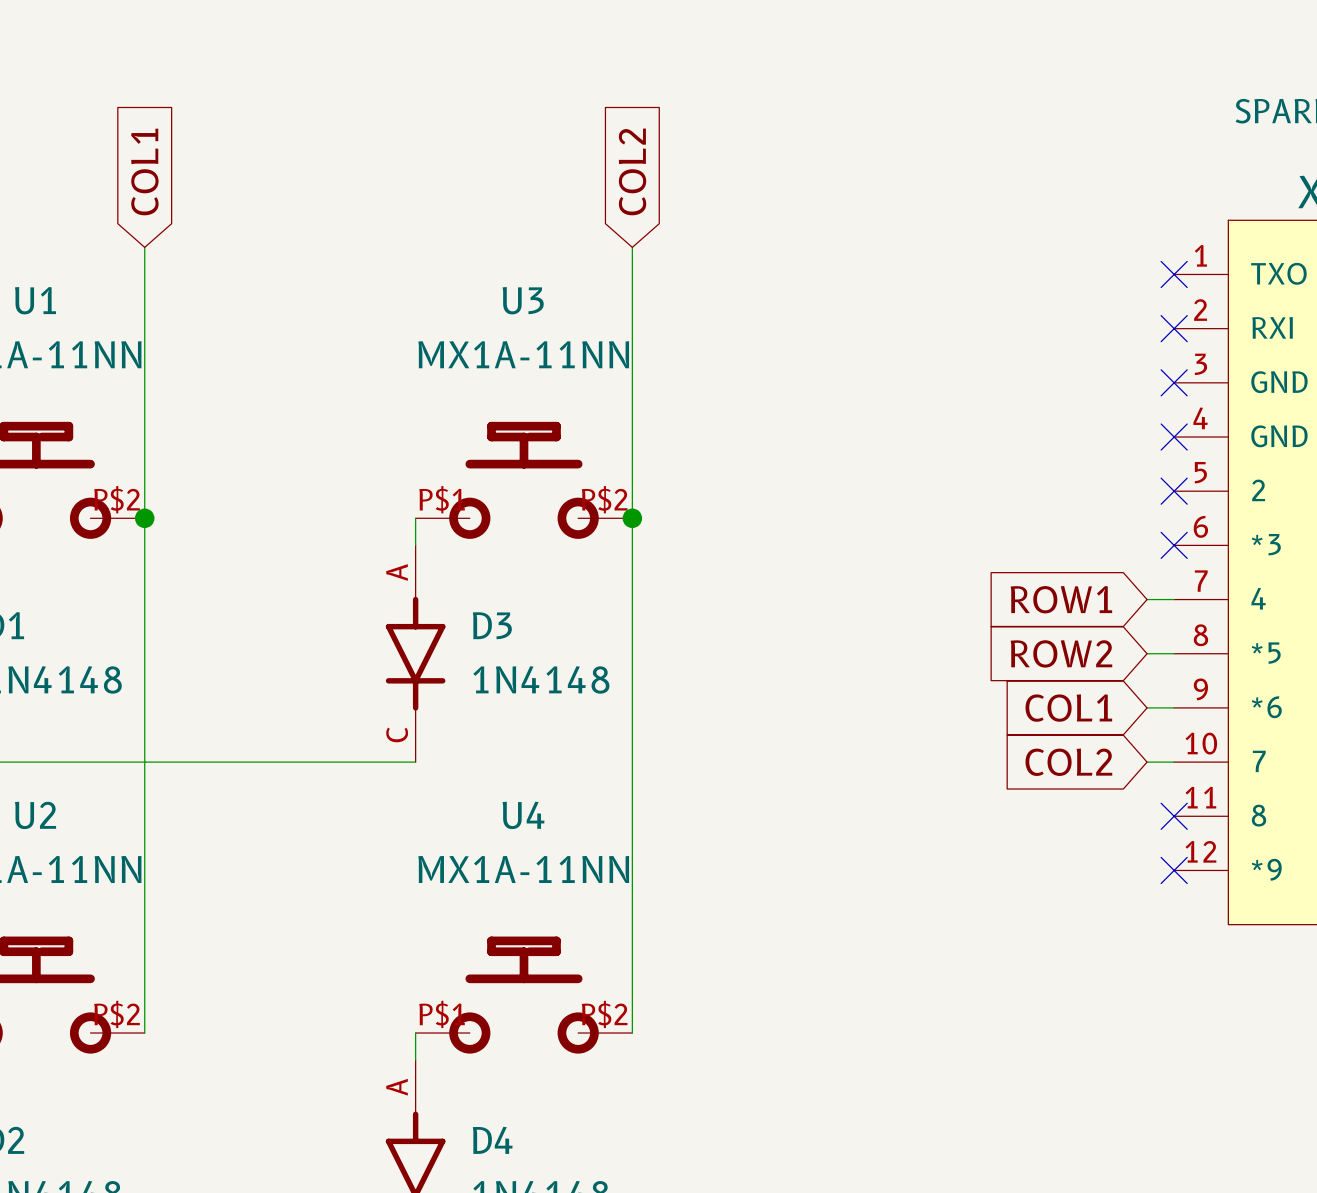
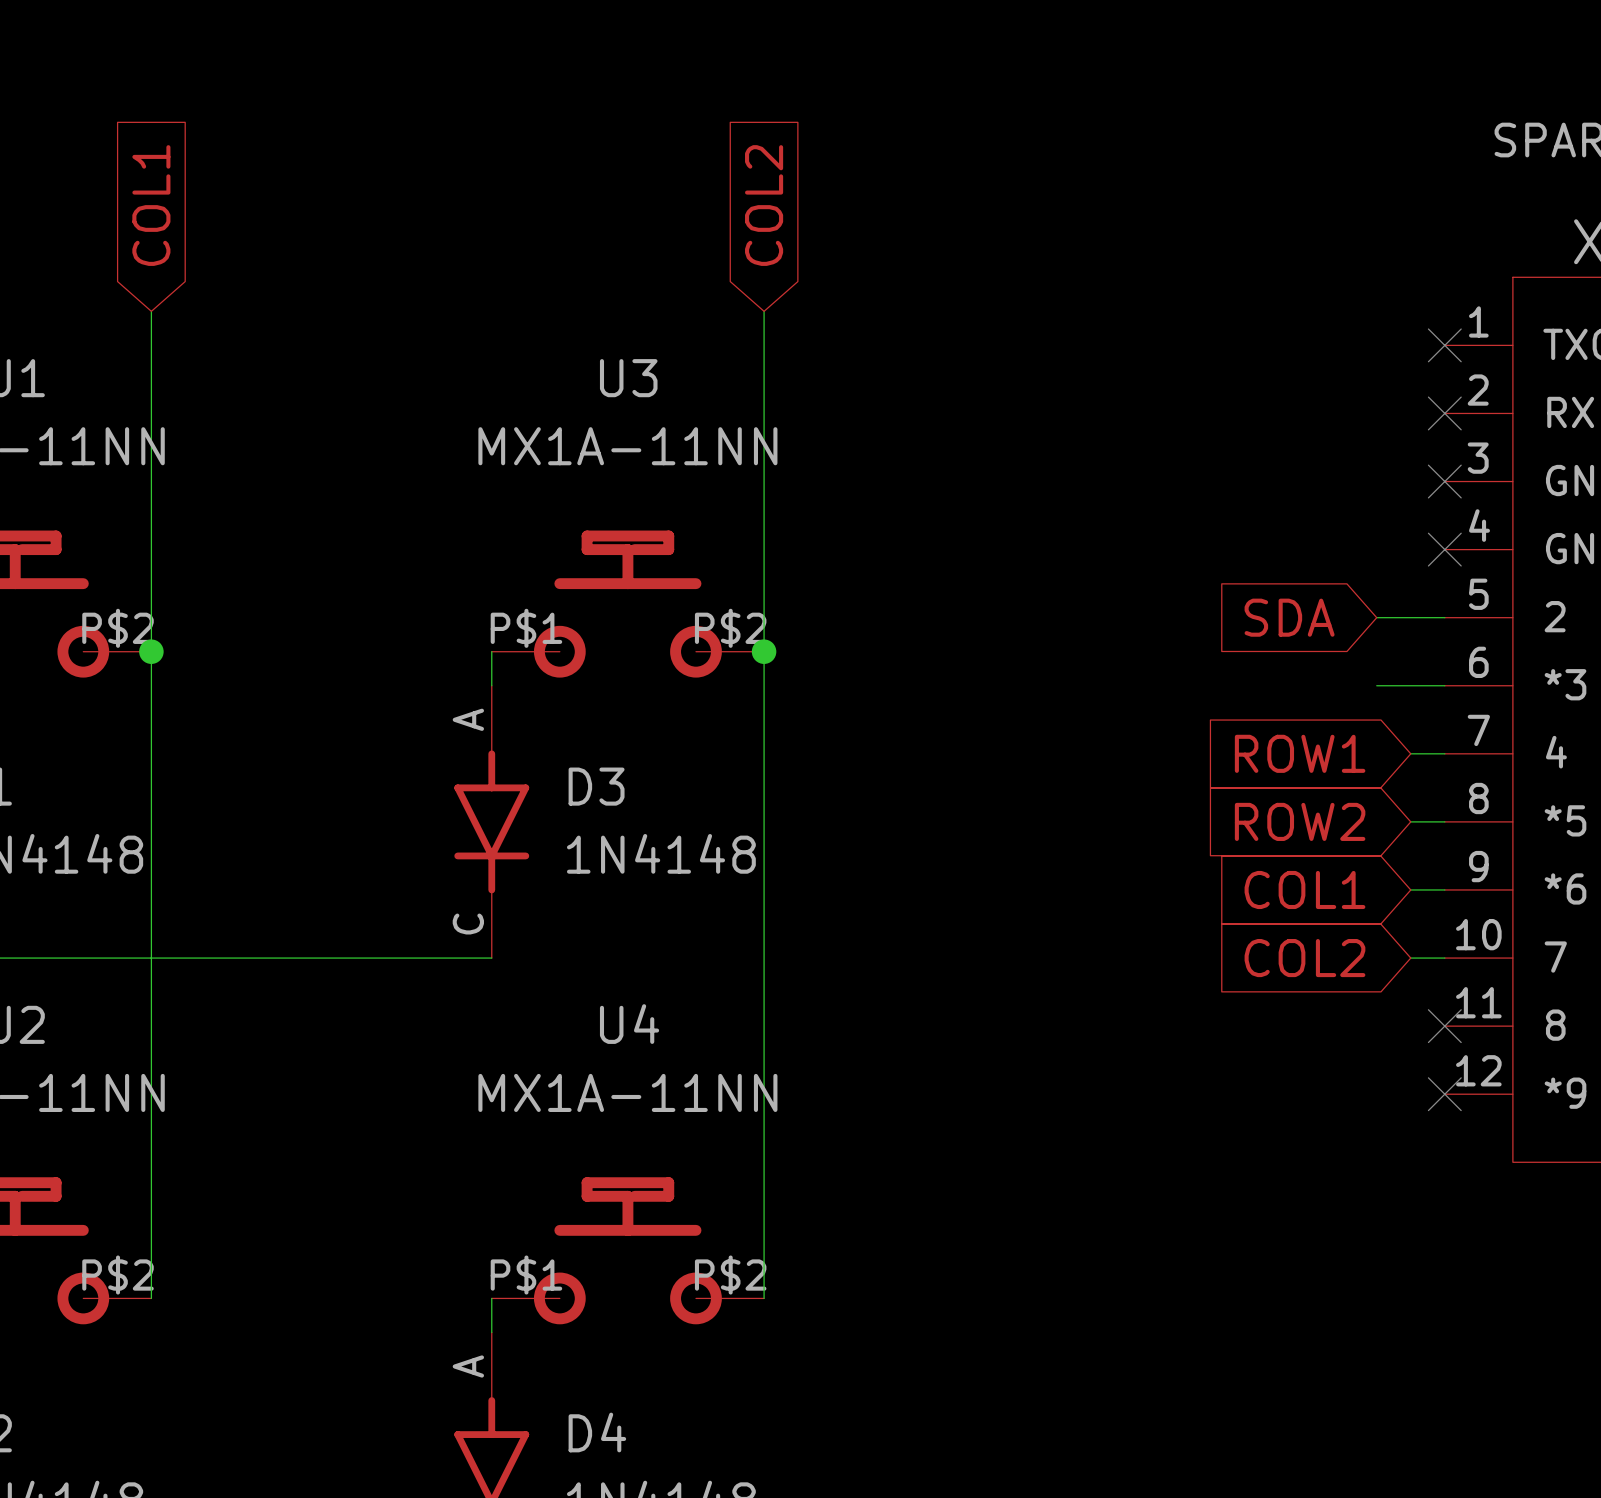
global label: none -> SDA (1289, 617)
wire: none -> (1376, 617) (1444, 617)
no-connect mark: (1174, 491) -> none
wire: none -> (1376, 685) (1444, 685)
no-connect mark: (1174, 545) -> none

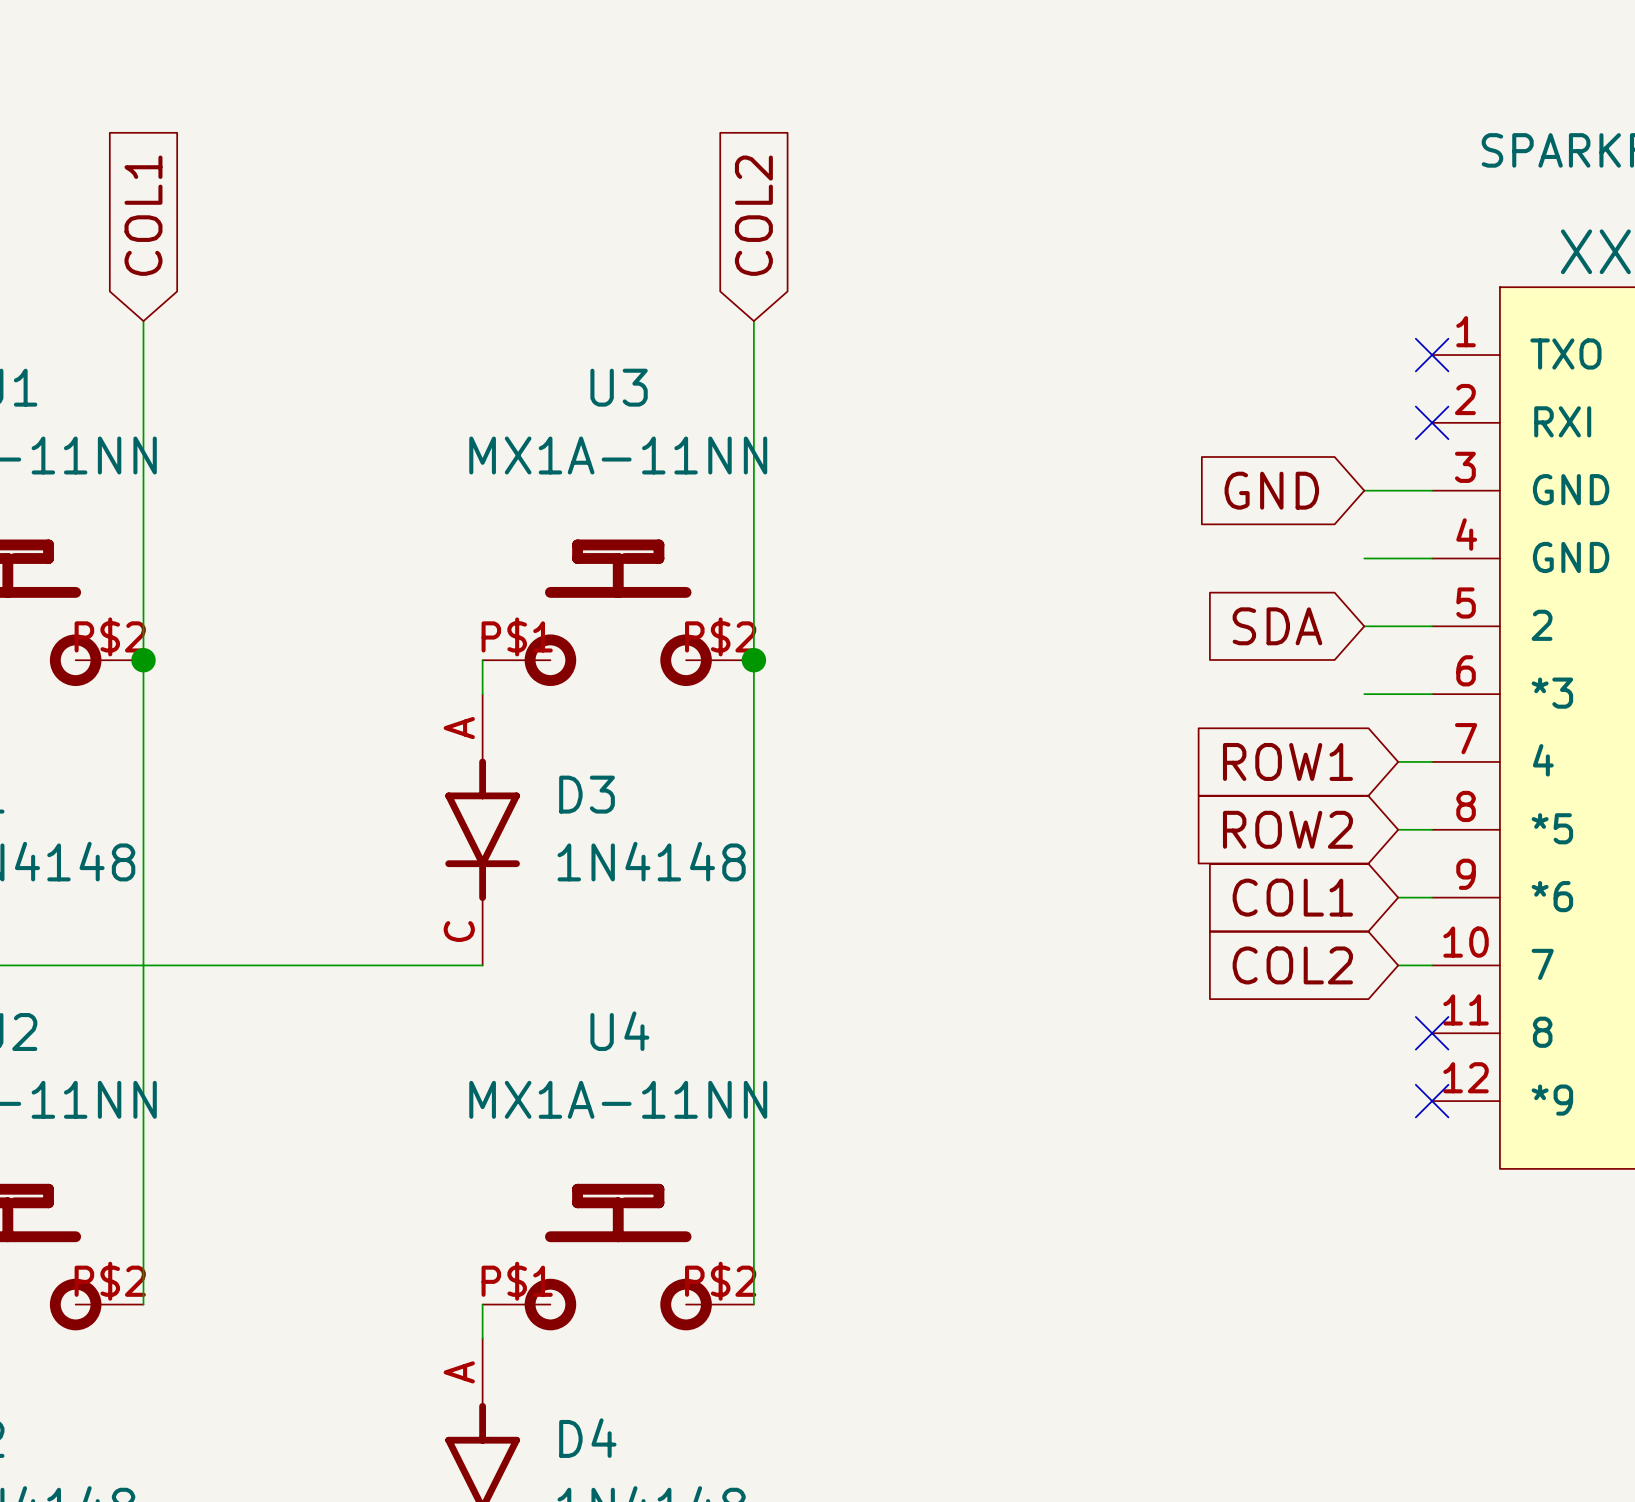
global label: none -> GND (1271, 490)
wire: none -> (1364, 490) (1432, 490)
no-connect mark: (1444, 481) -> none
wire: none -> (1364, 558) (1432, 558)
no-connect mark: (1444, 549) -> none

